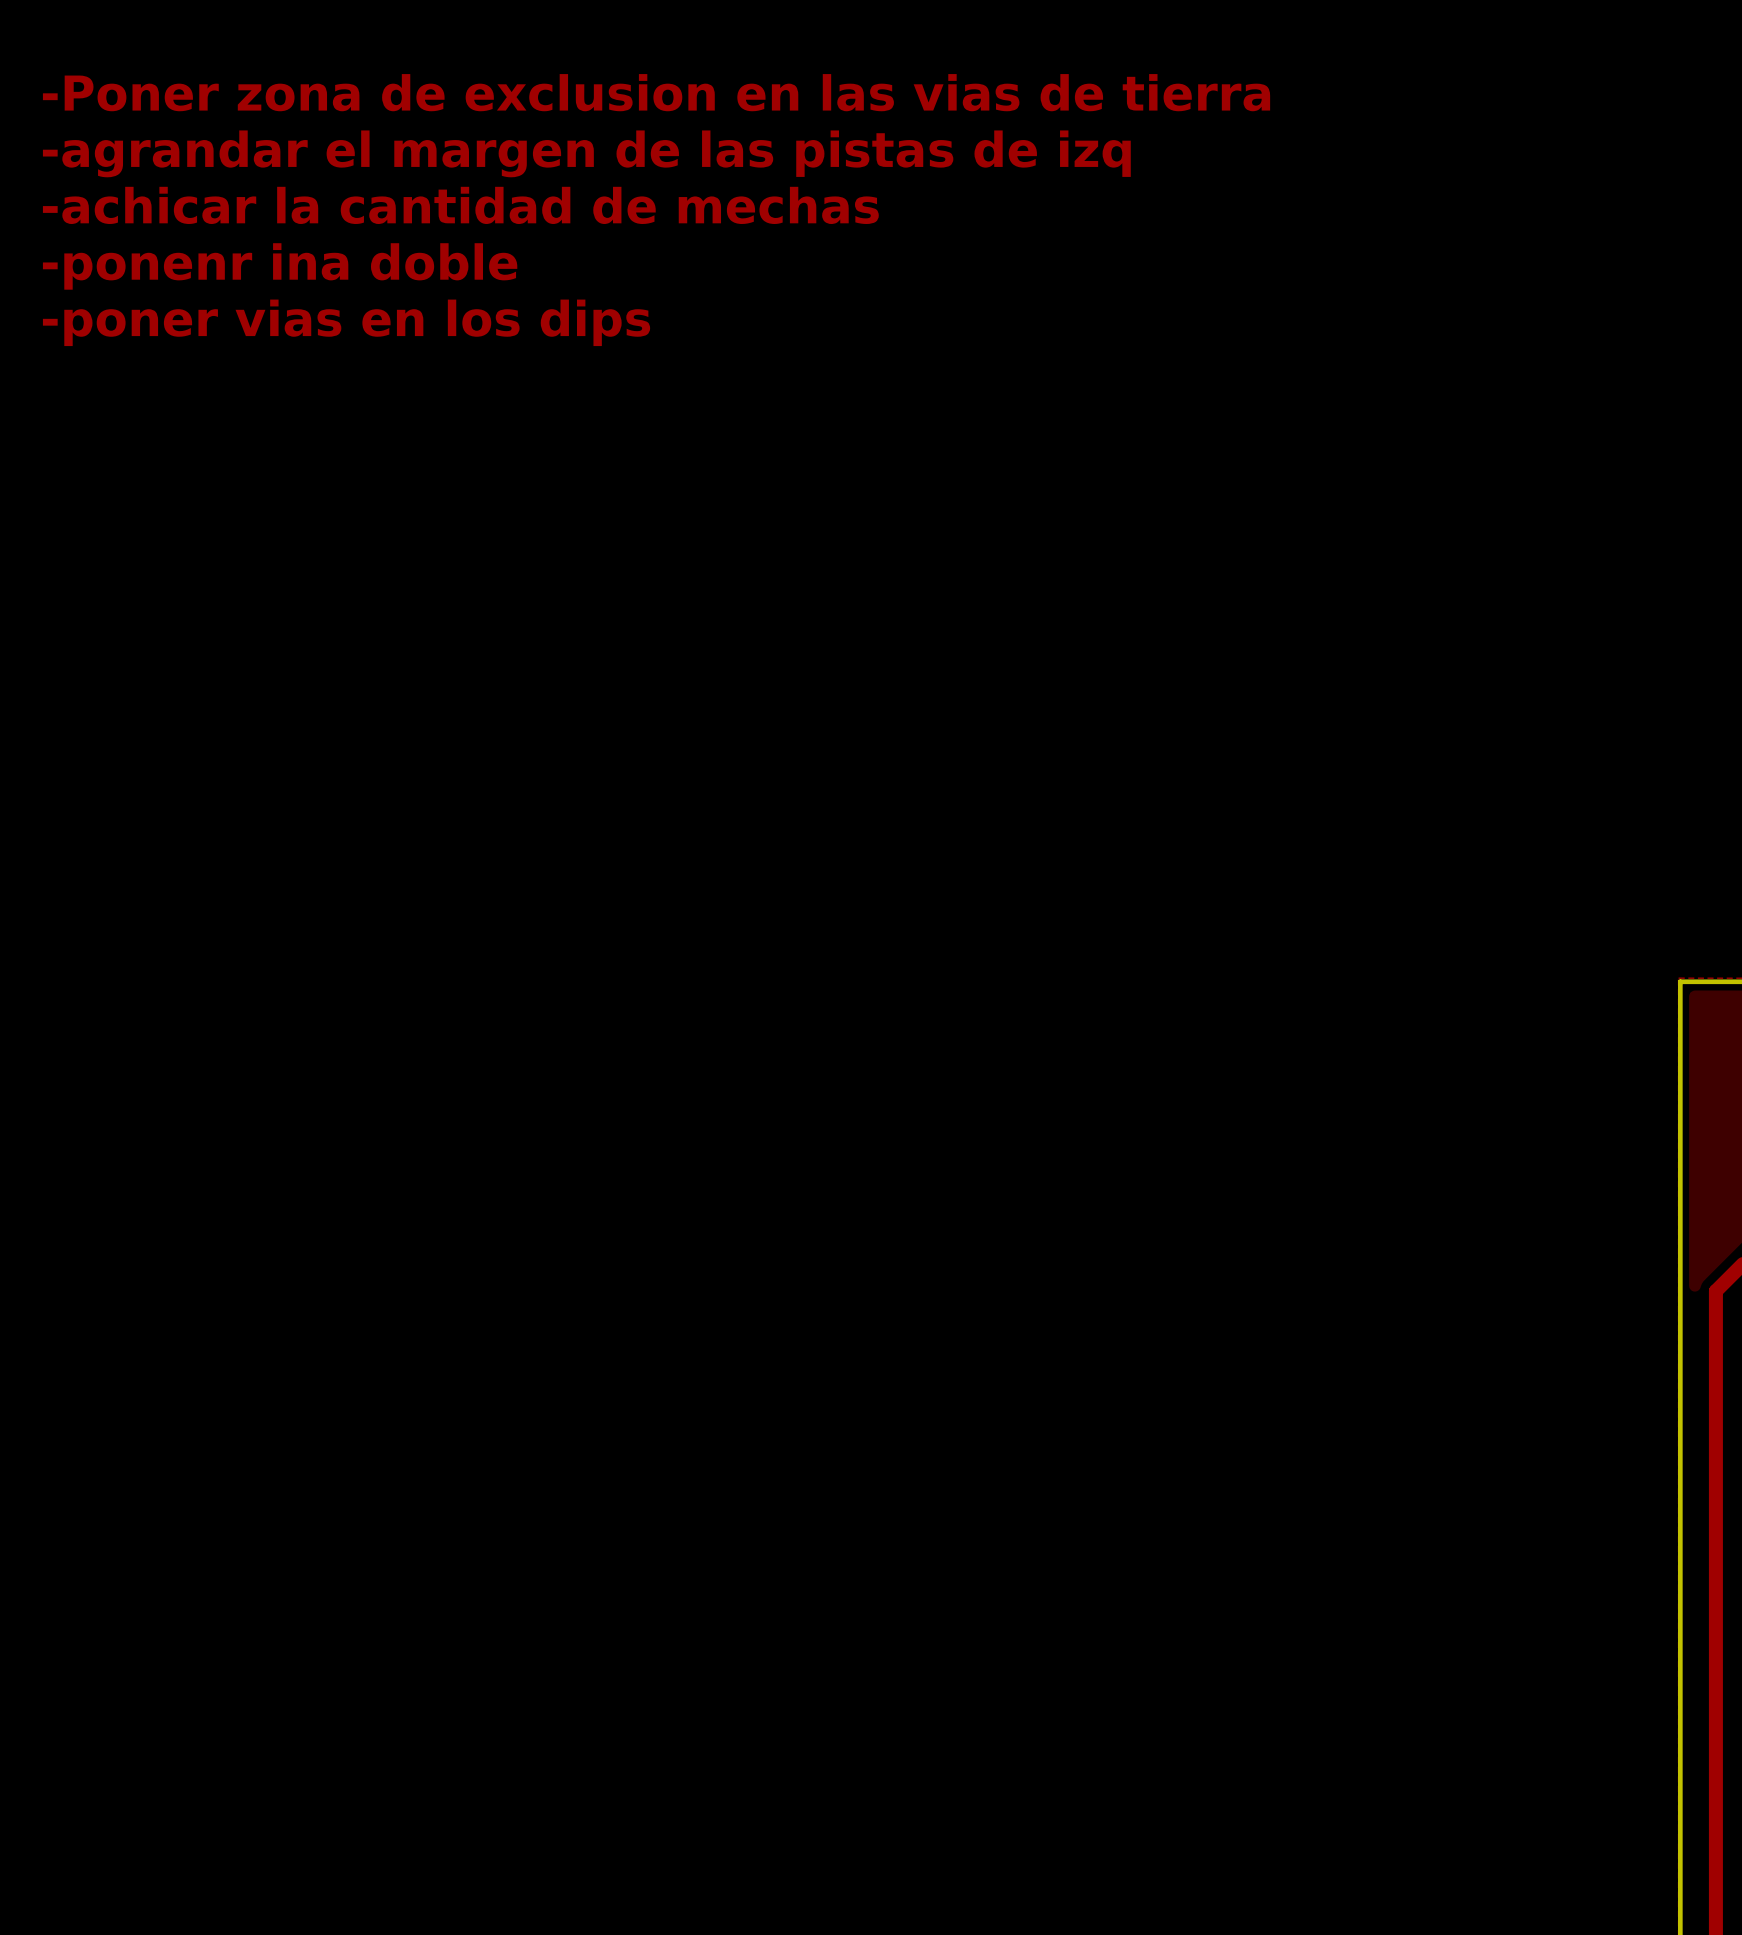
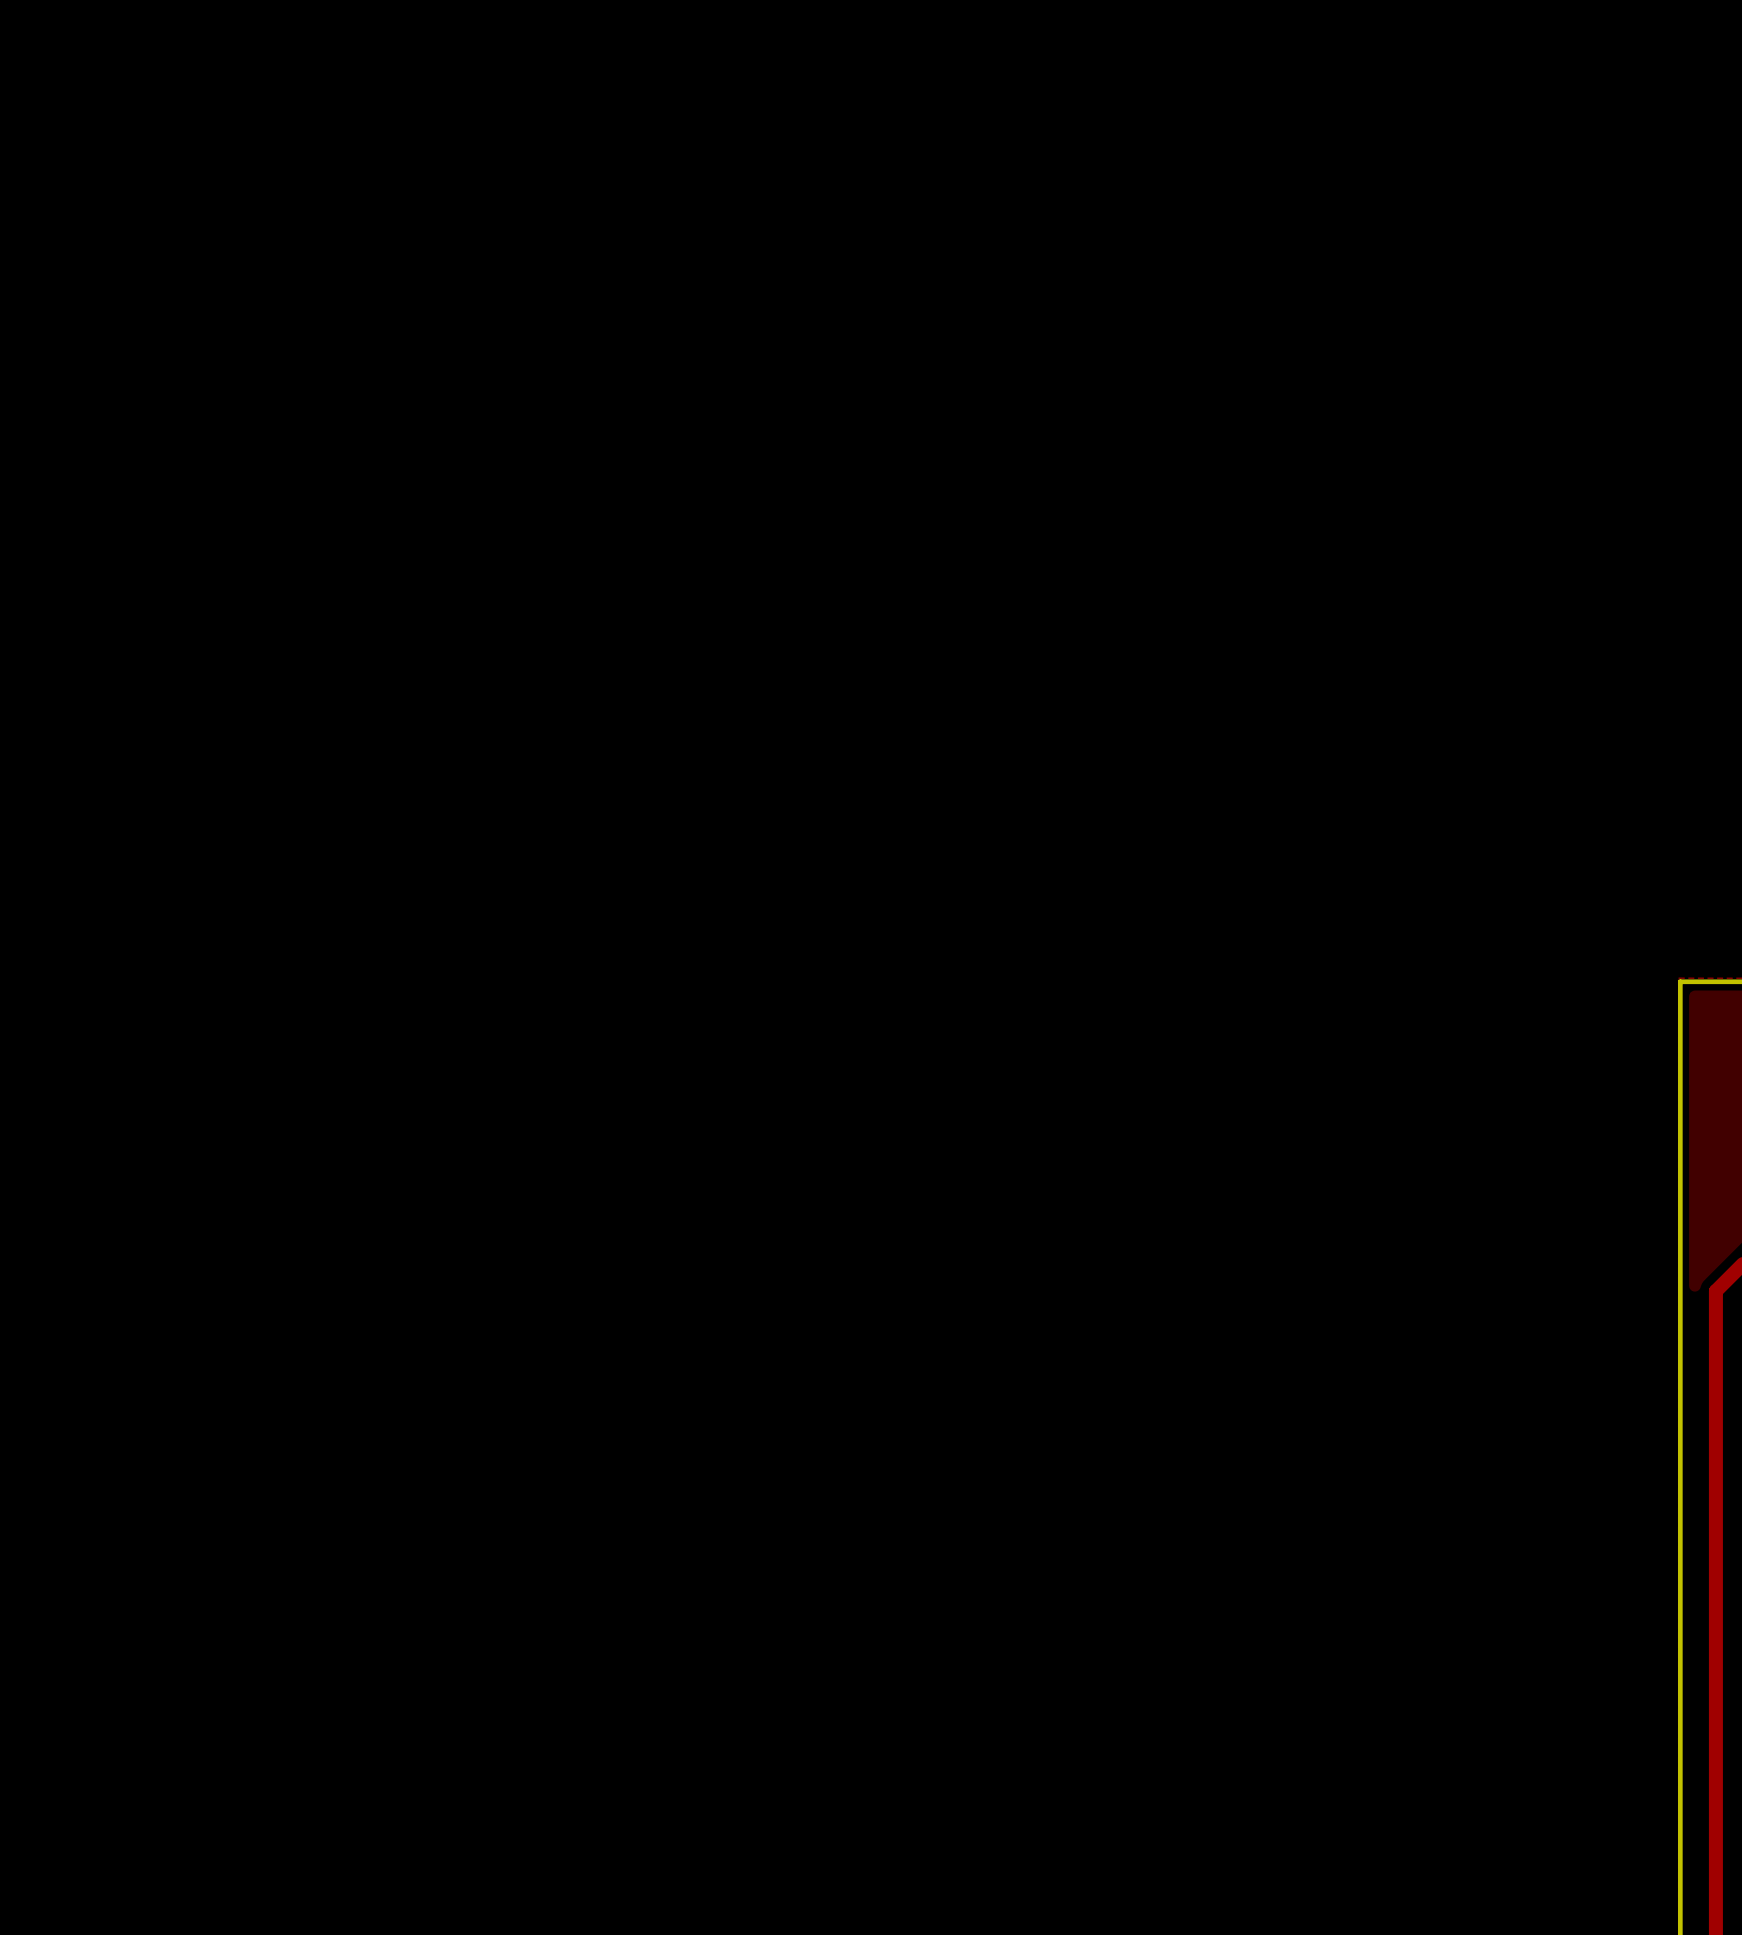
text: -Poner zona de exclusion en las vias de tierra (656, 92) -> none
text: -agrandar el margen de las pistas de izq (586, 153) -> none
text: -achicar la cantidad de mechas (460, 205) -> none
text: -ponenr ina doble (280, 266) -> none
text: -poner vias en los dips (346, 322) -> none

